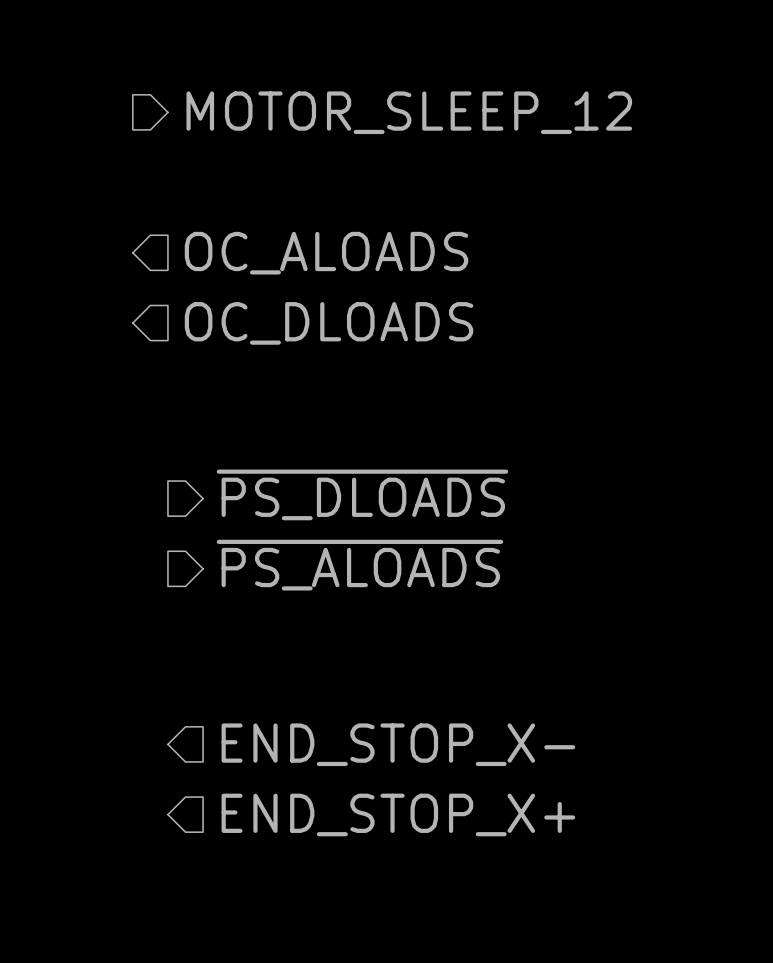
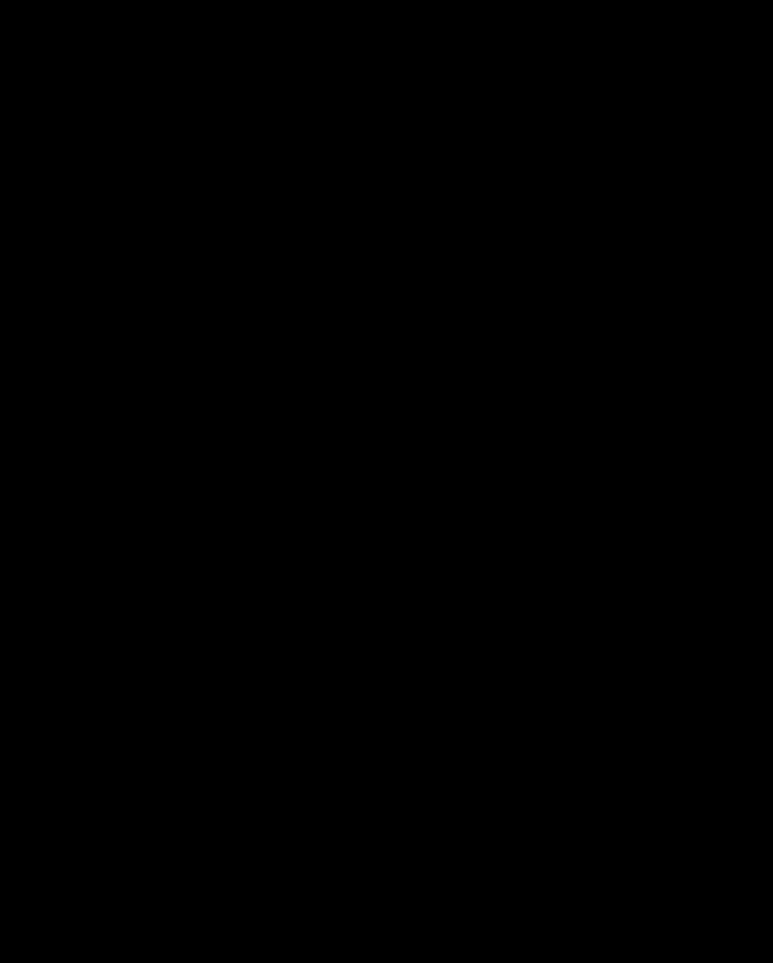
hierarchical label: MOTOR_SLEEP_12 (409, 112) -> none
hierarchical label: OC_ALOADS (326, 253) -> none
hierarchical label: OC_DLOADS (329, 323) -> none
hierarchical label: ~{PS_DLOADS} (362, 494) -> none
hierarchical label: ~{PS_ALOADS} (359, 565) -> none
hierarchical label: END_STOP_X- (398, 744) -> none
hierarchical label: END_STOP_X+ (398, 814) -> none

